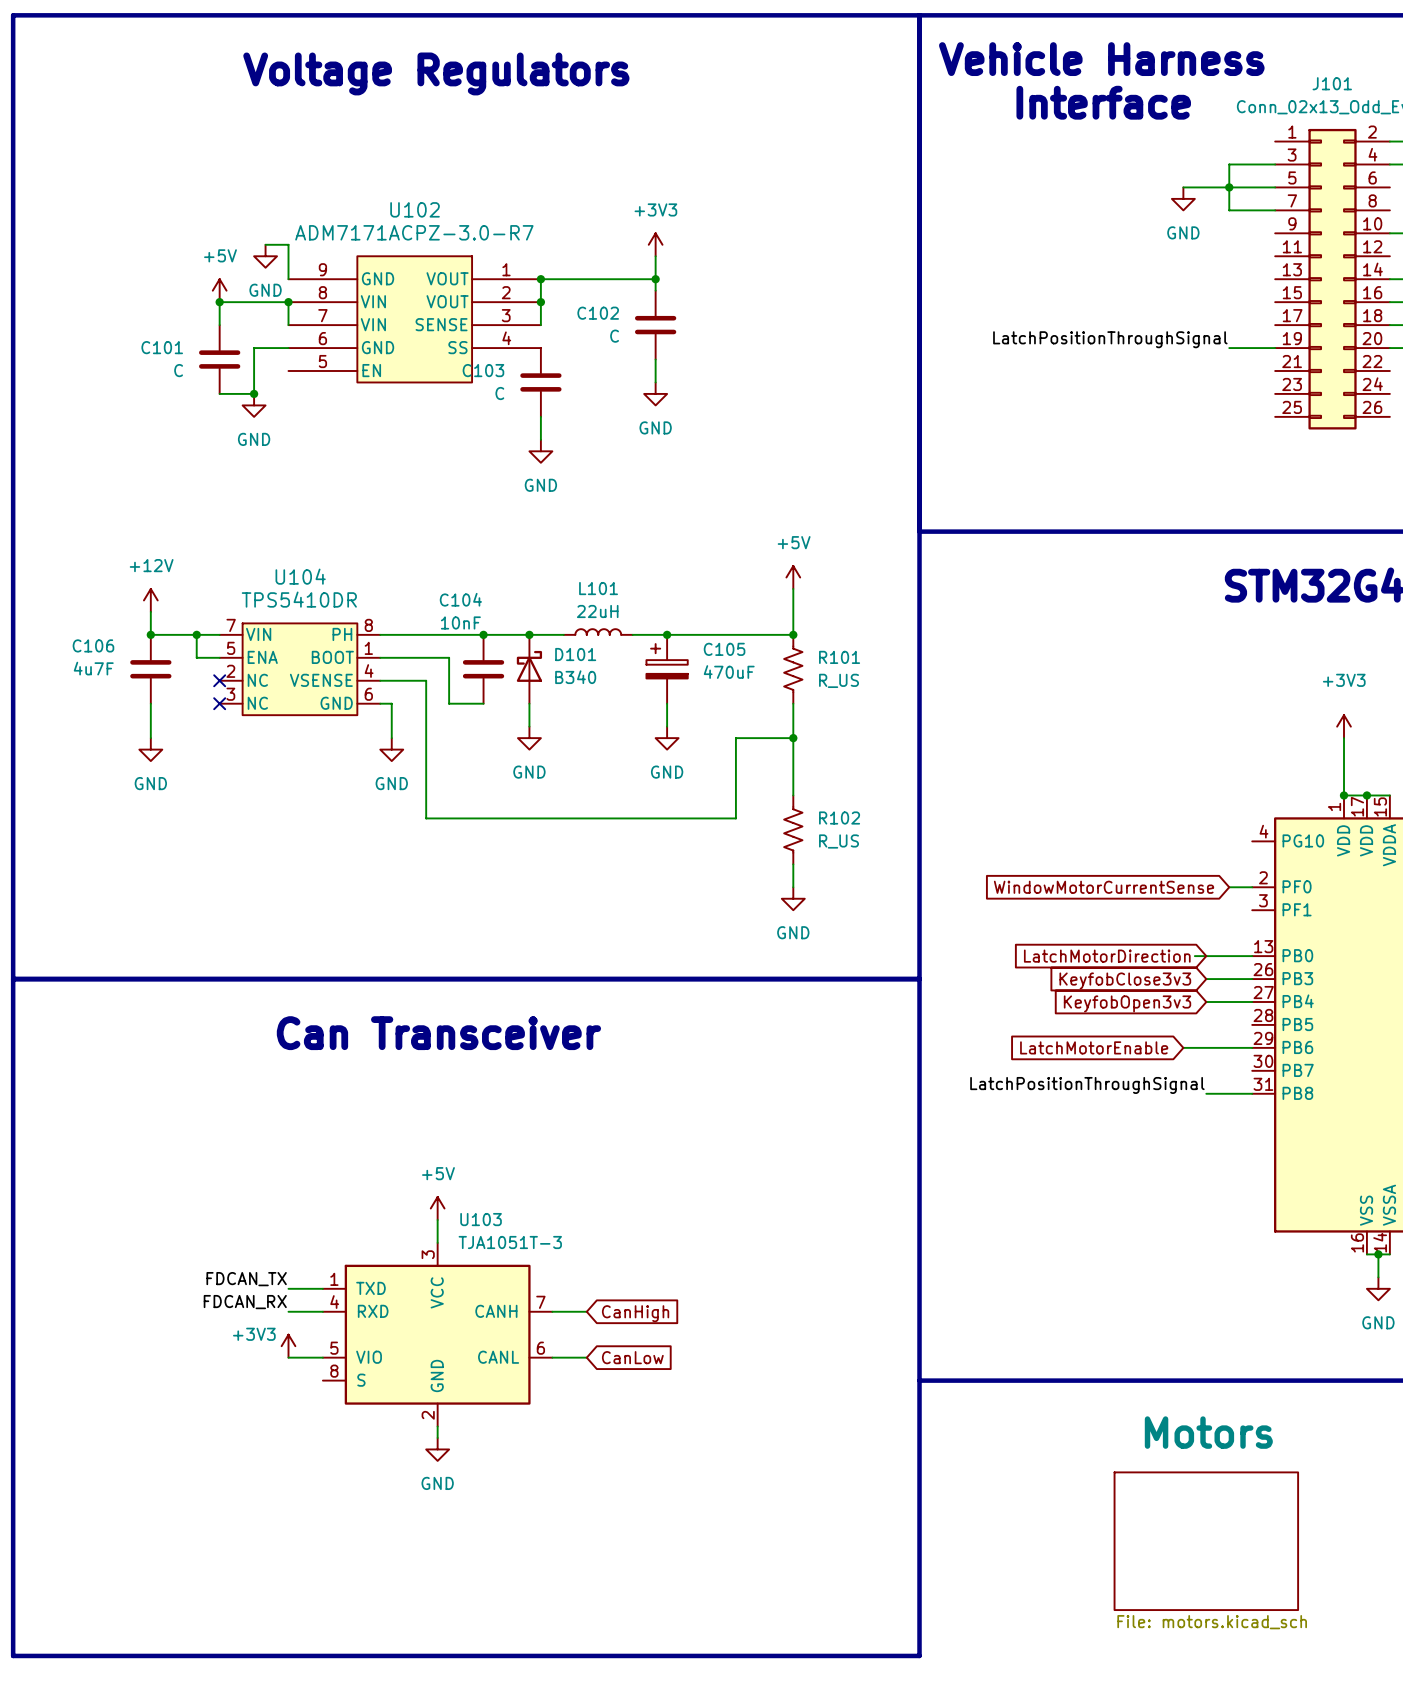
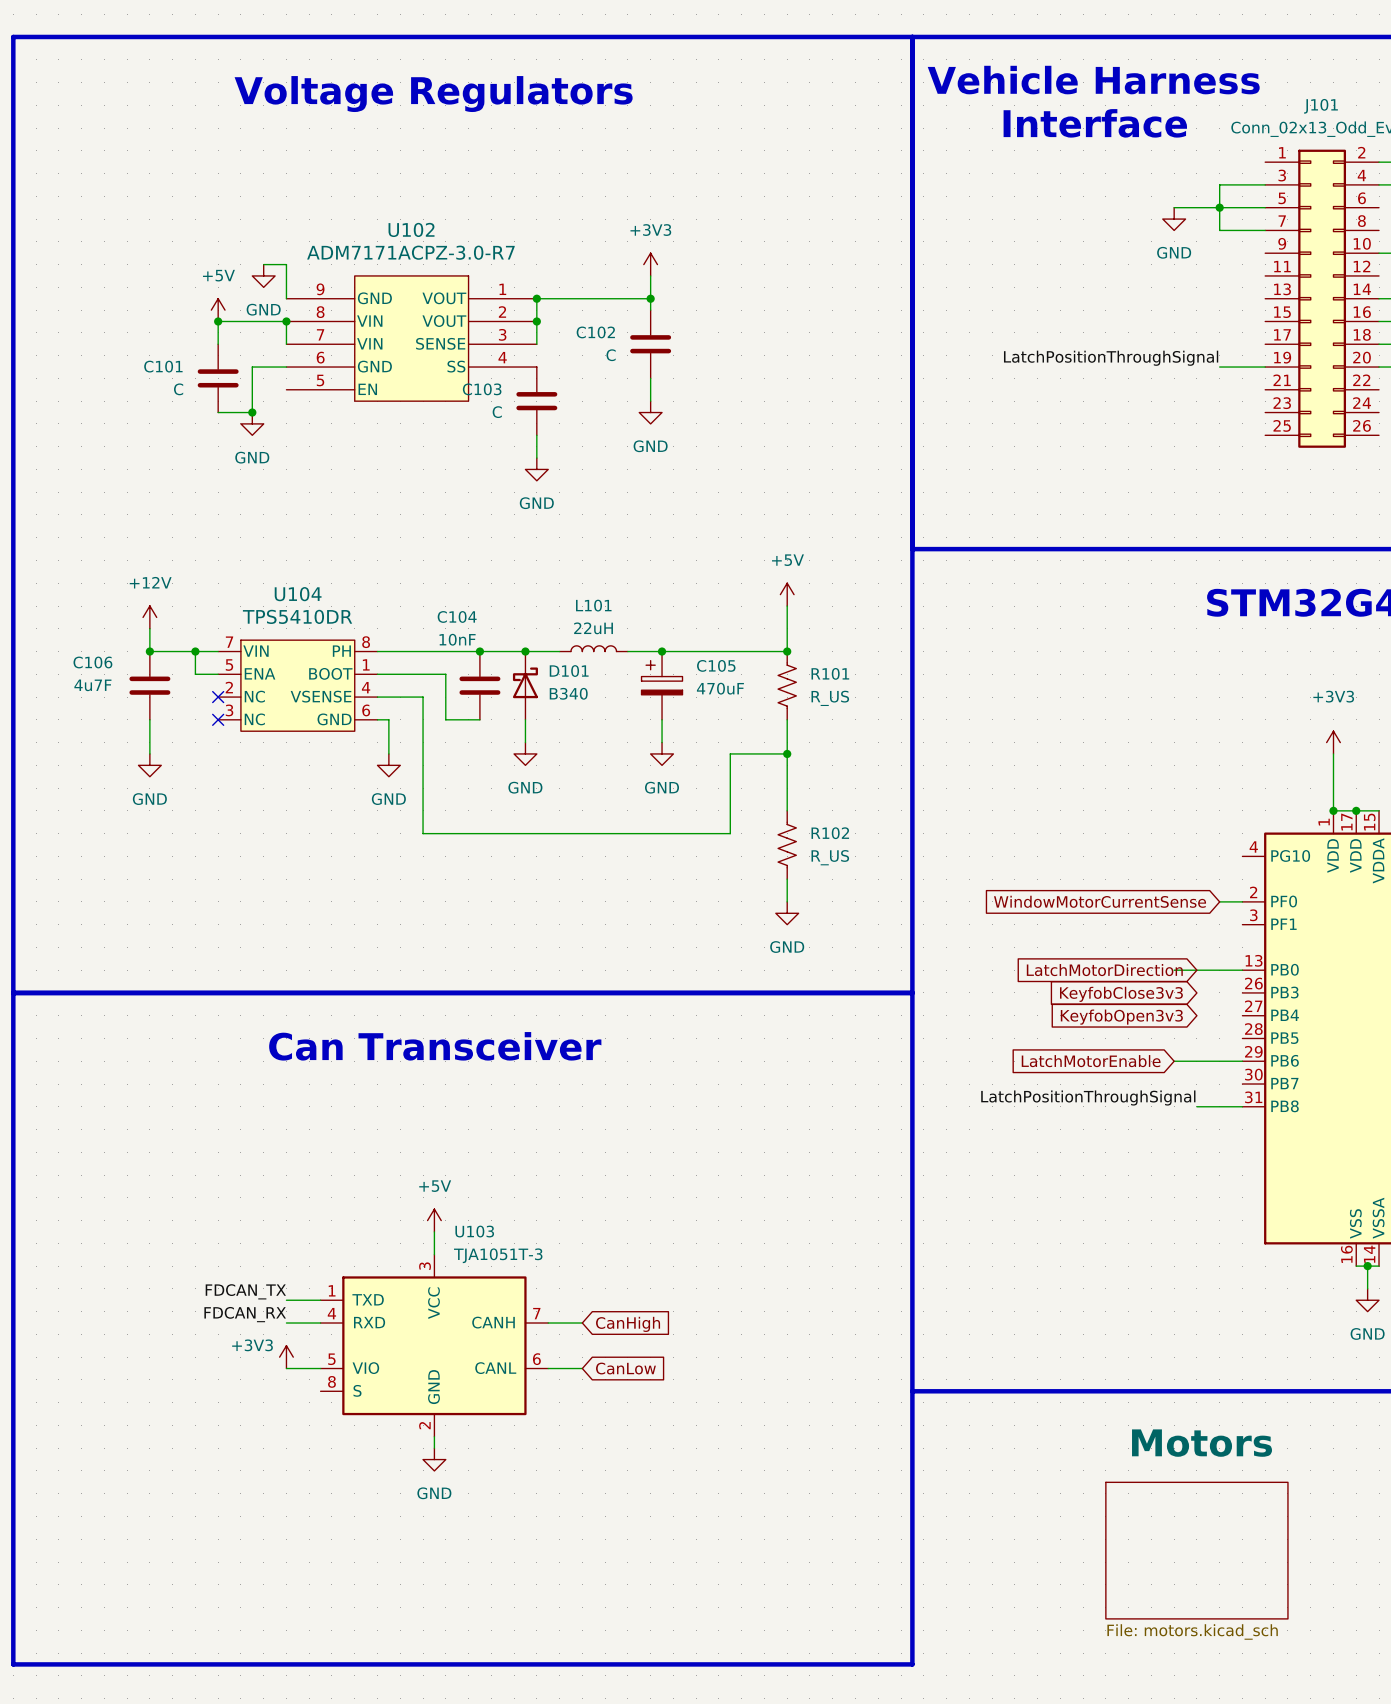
wire: none -> (1174, 970) (1185, 970)
wire: (1206, 979) (1252, 979) -> none
wire: (1206, 1002) (1252, 1002) -> none

